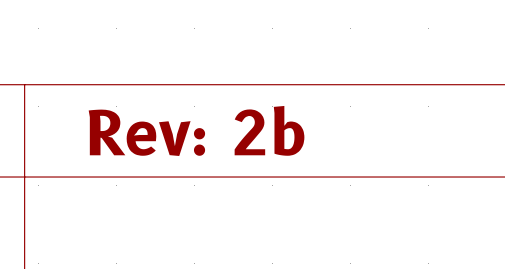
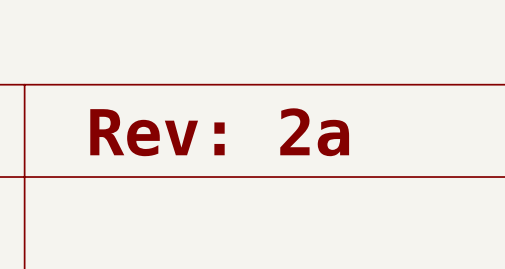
title block: Rev: 2b (196, 130) -> Rev: 2a (219, 132)

